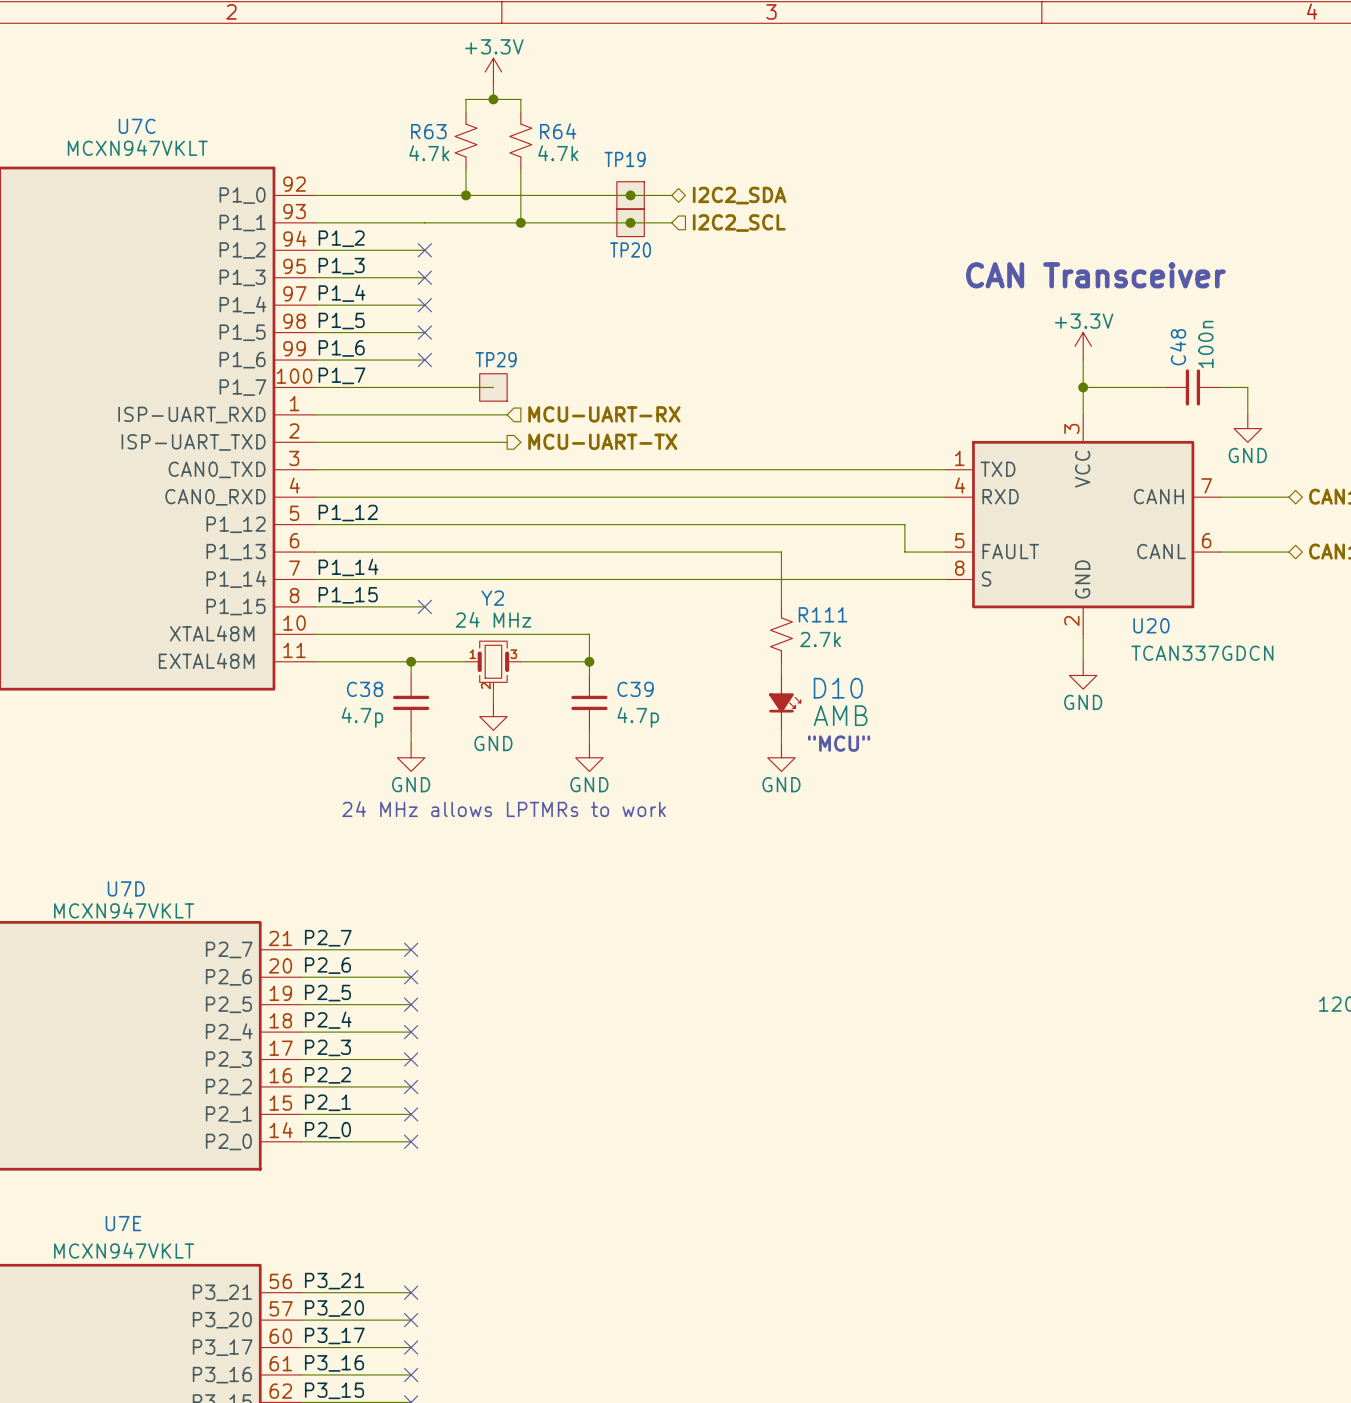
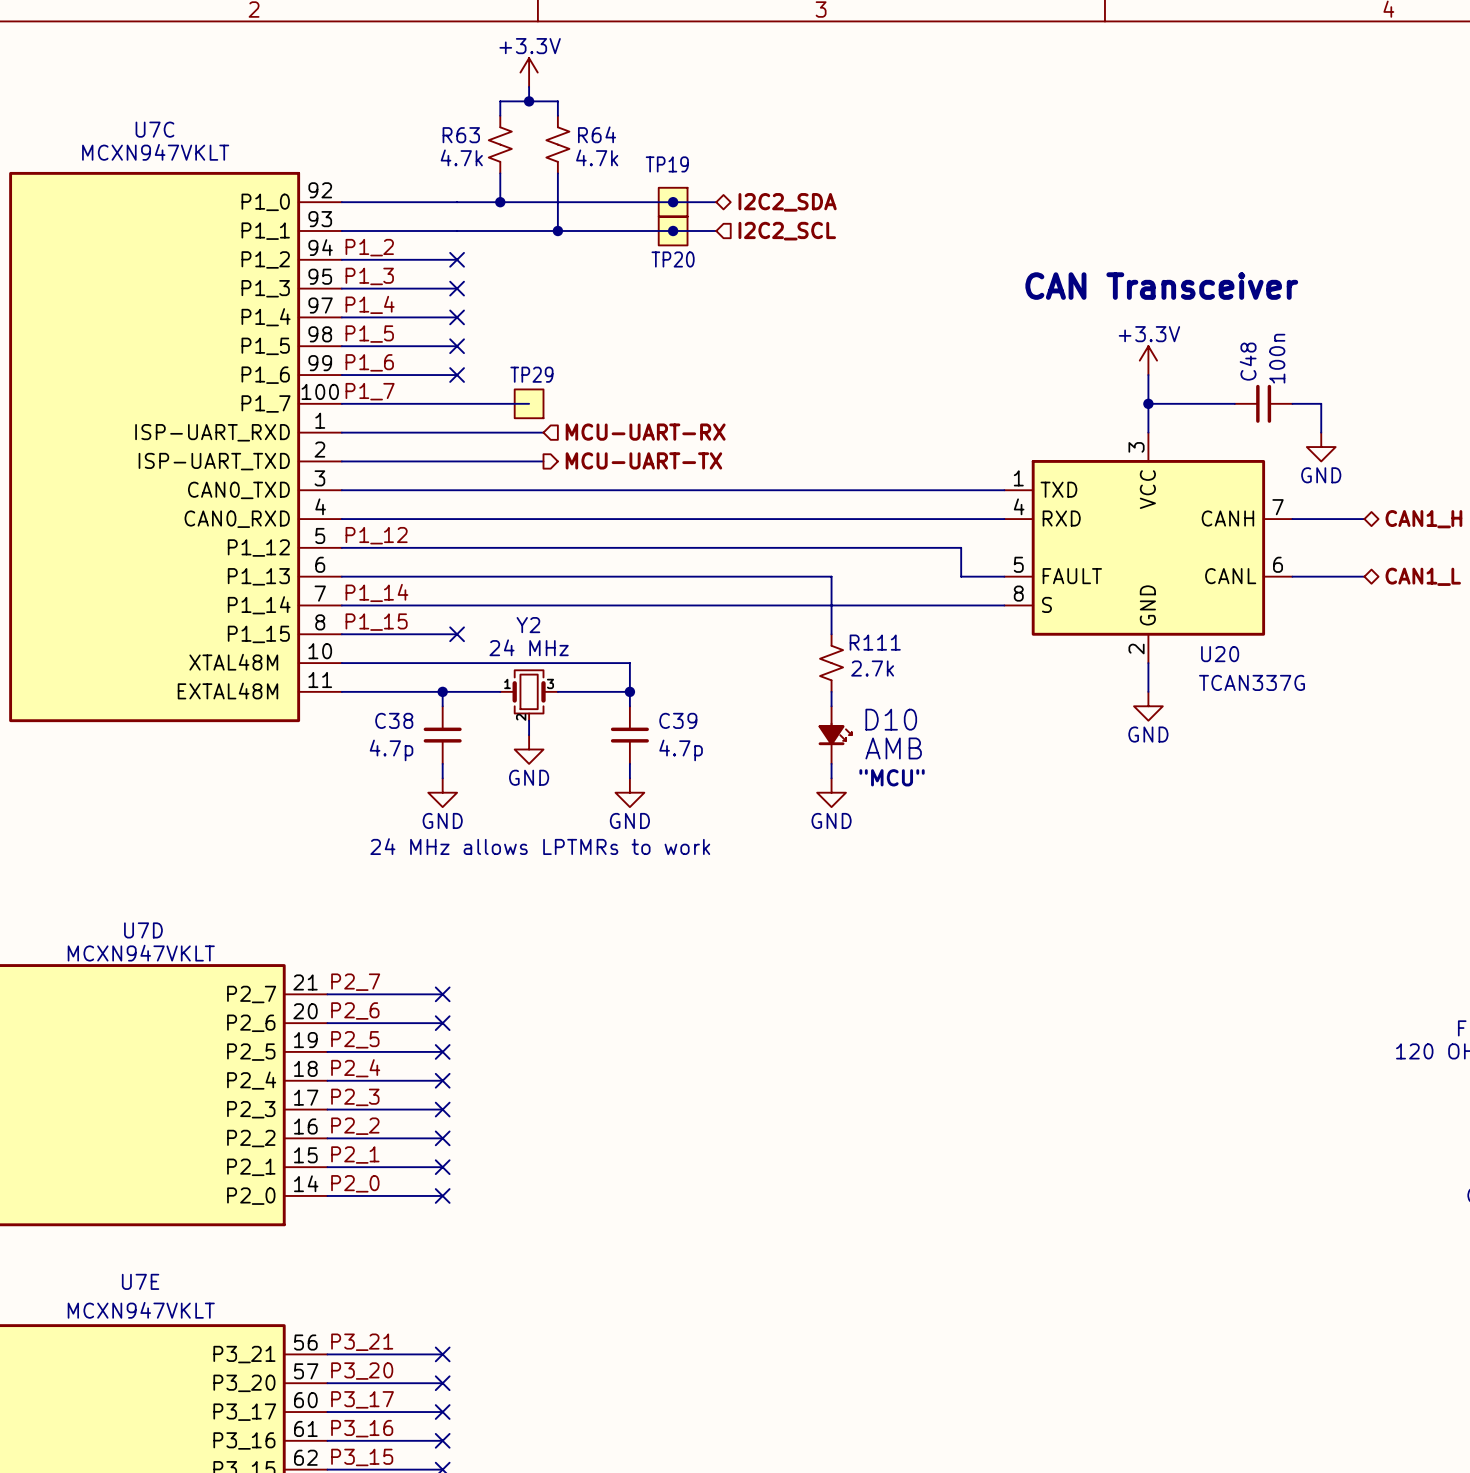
U20 value: TCAN337GDCN (1202, 653) -> TCAN337G (1252, 682)

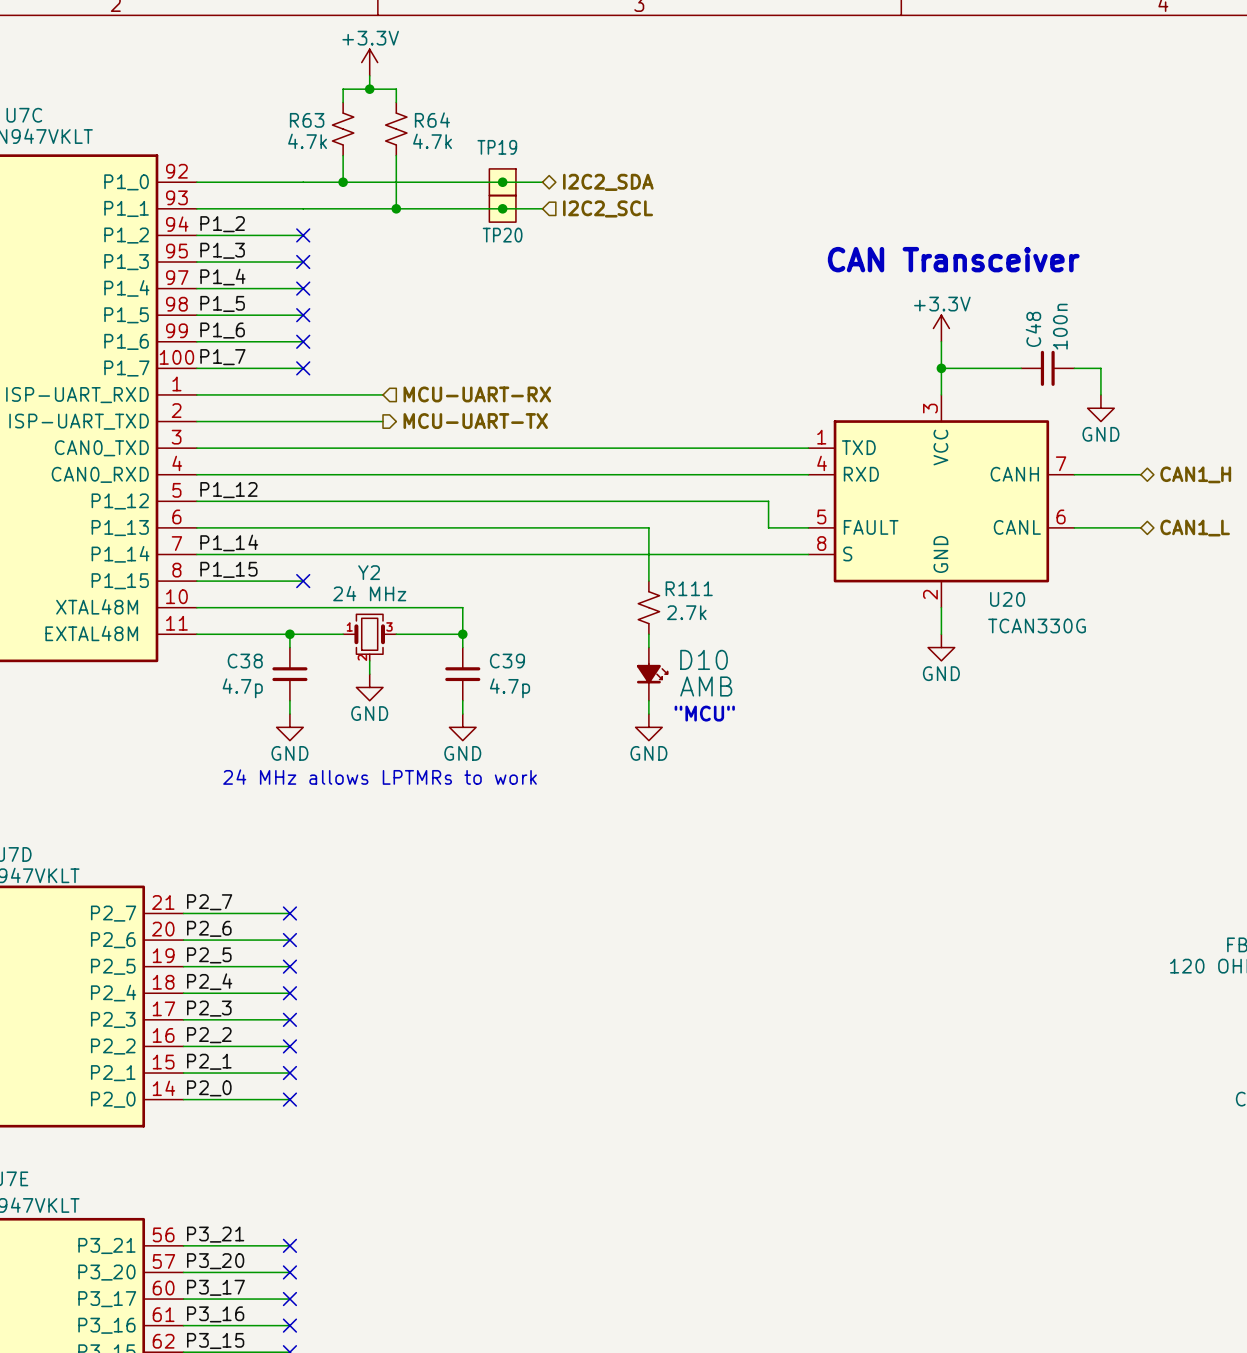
wire: (457, 403) (529, 403) -> none
no-connect mark: none -> (303, 368)
TP29: (529, 403) -> none
U20 value: TCAN337G (1252, 682) -> TCAN330G (1037, 625)

